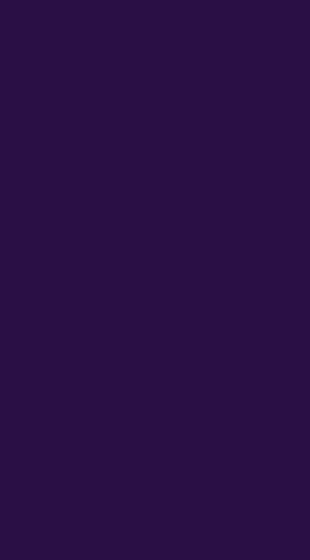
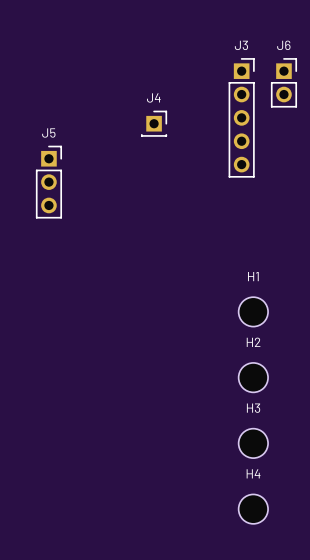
J6: none -> (283, 82)
J3: none -> (241, 117)
J4: none -> (154, 123)
J5: none -> (48, 182)
H1: none -> (253, 311)
H2: none -> (253, 377)
H3: none -> (253, 443)
H4: none -> (253, 509)

